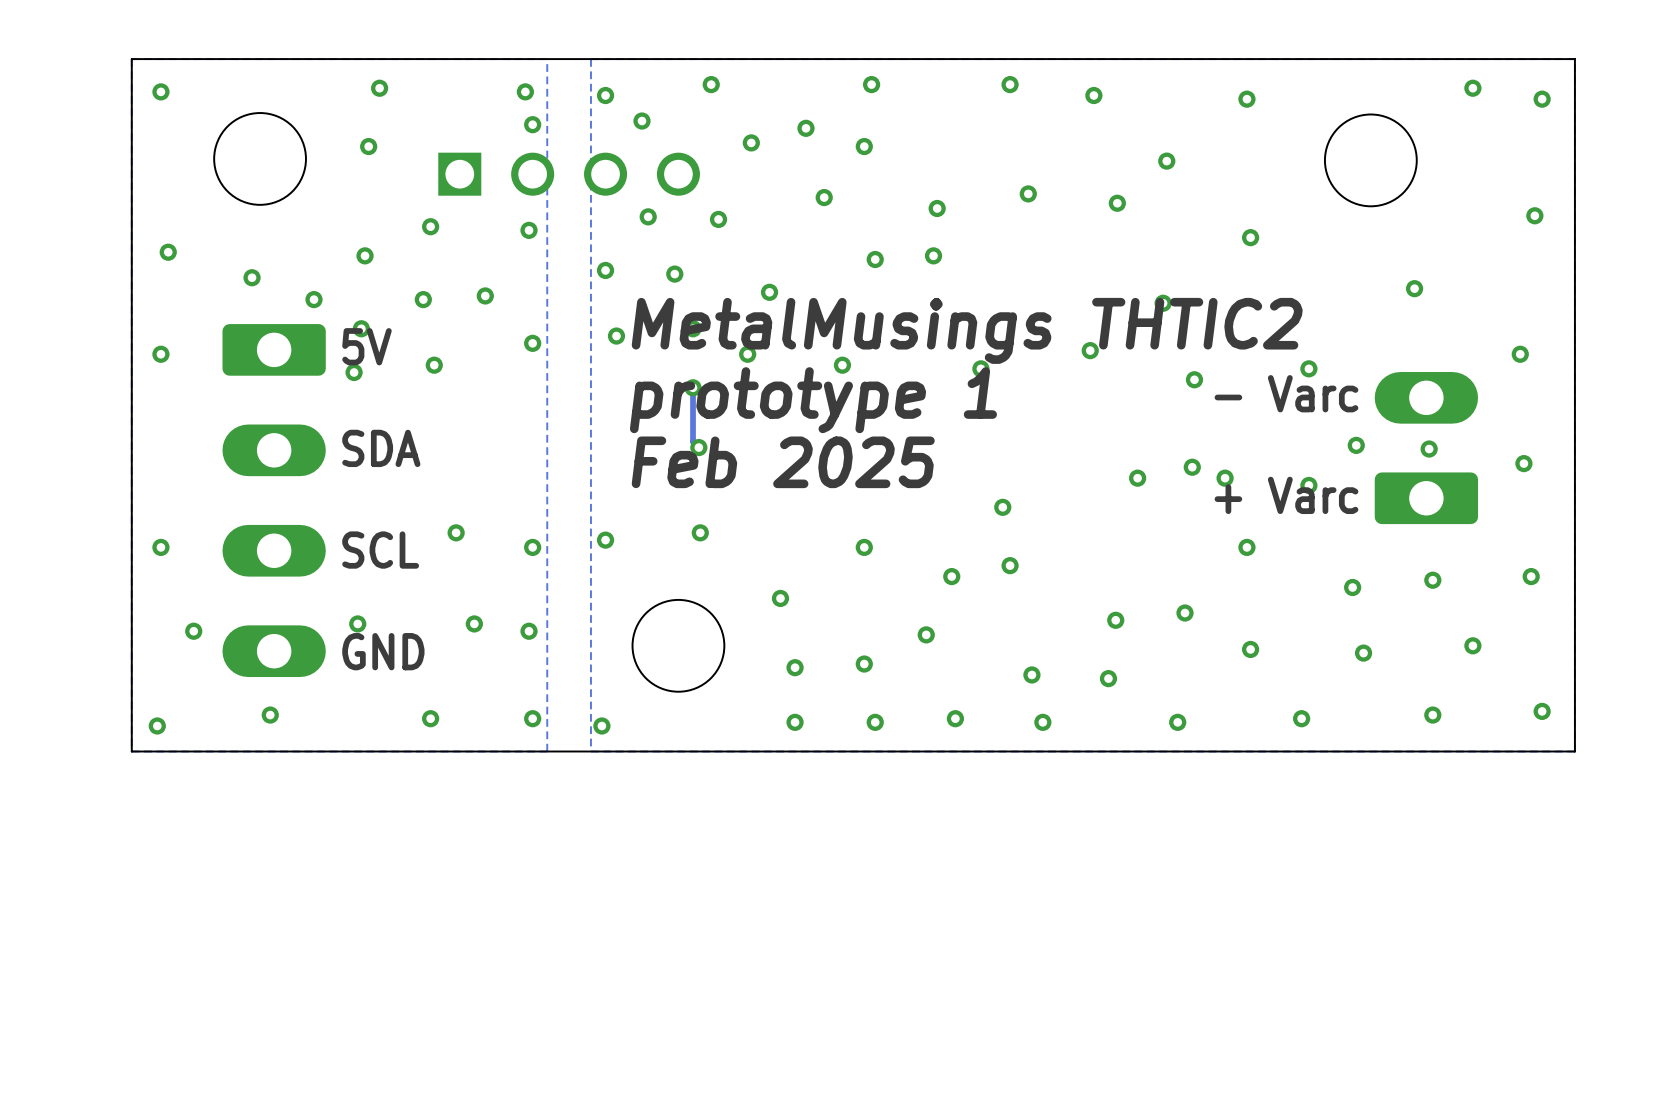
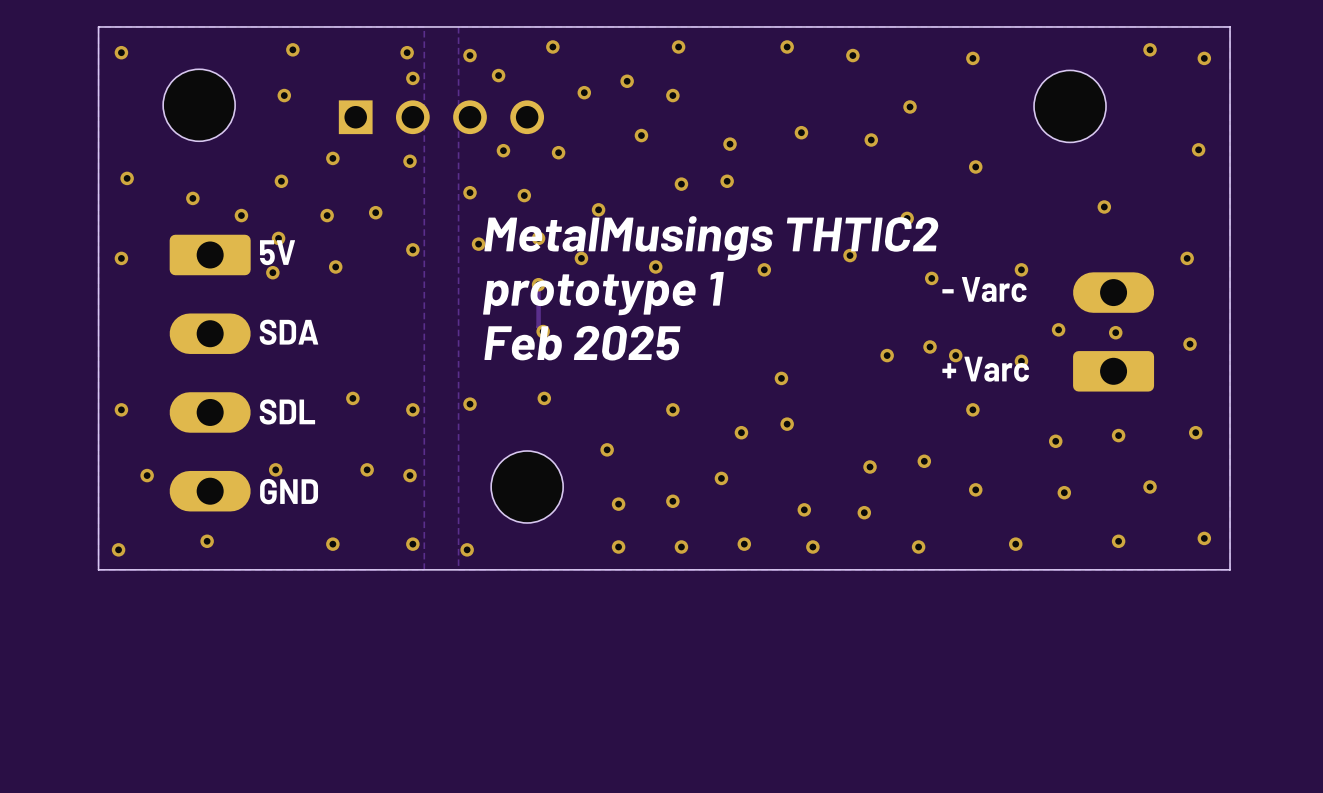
text: SCL (380, 550) -> SDL (287, 411)

